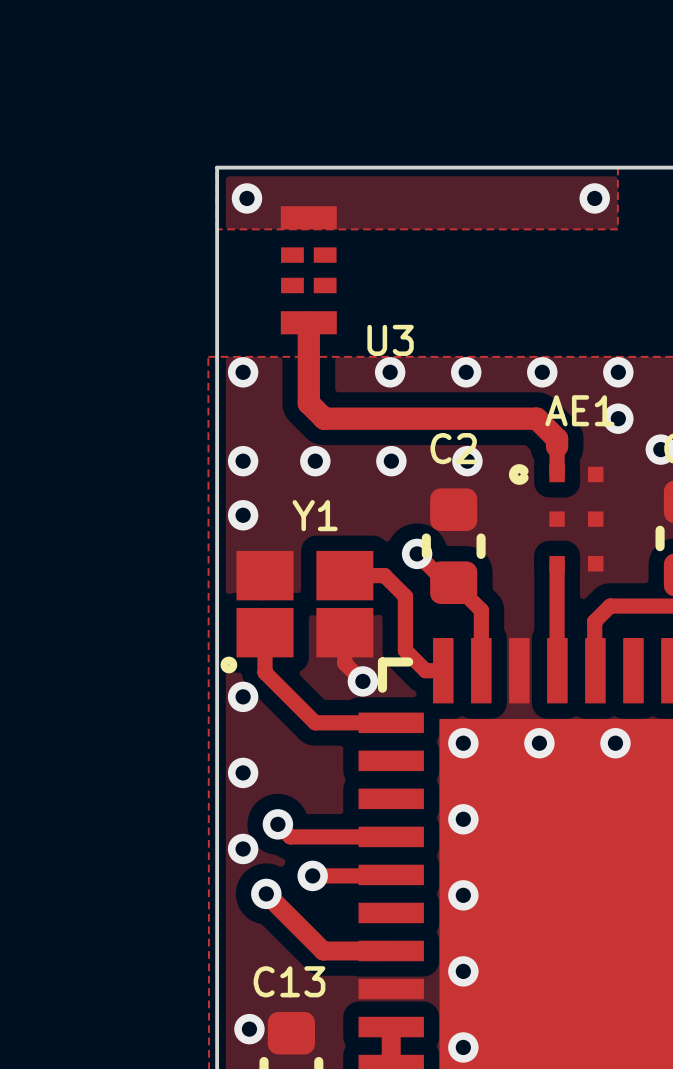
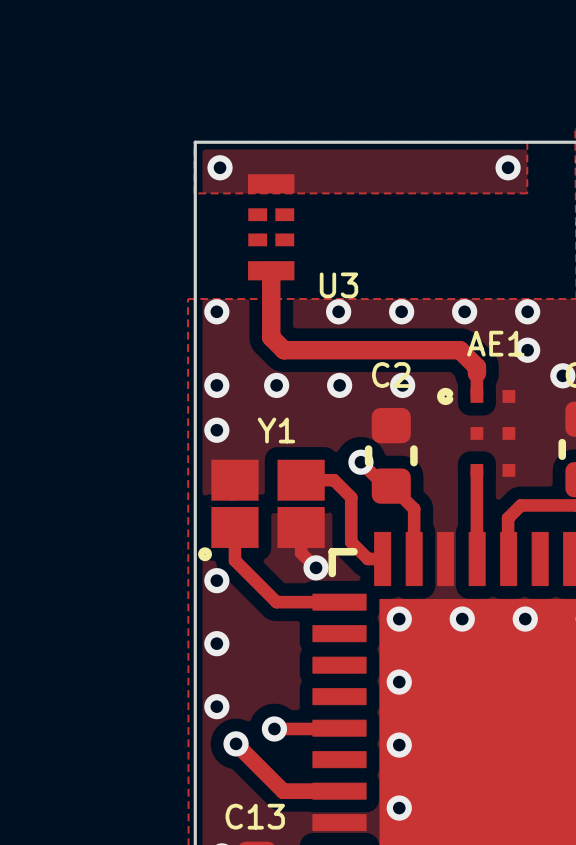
track: (277, 824) (290, 836) (391, 836) -> none
via: (277, 824) -> none

